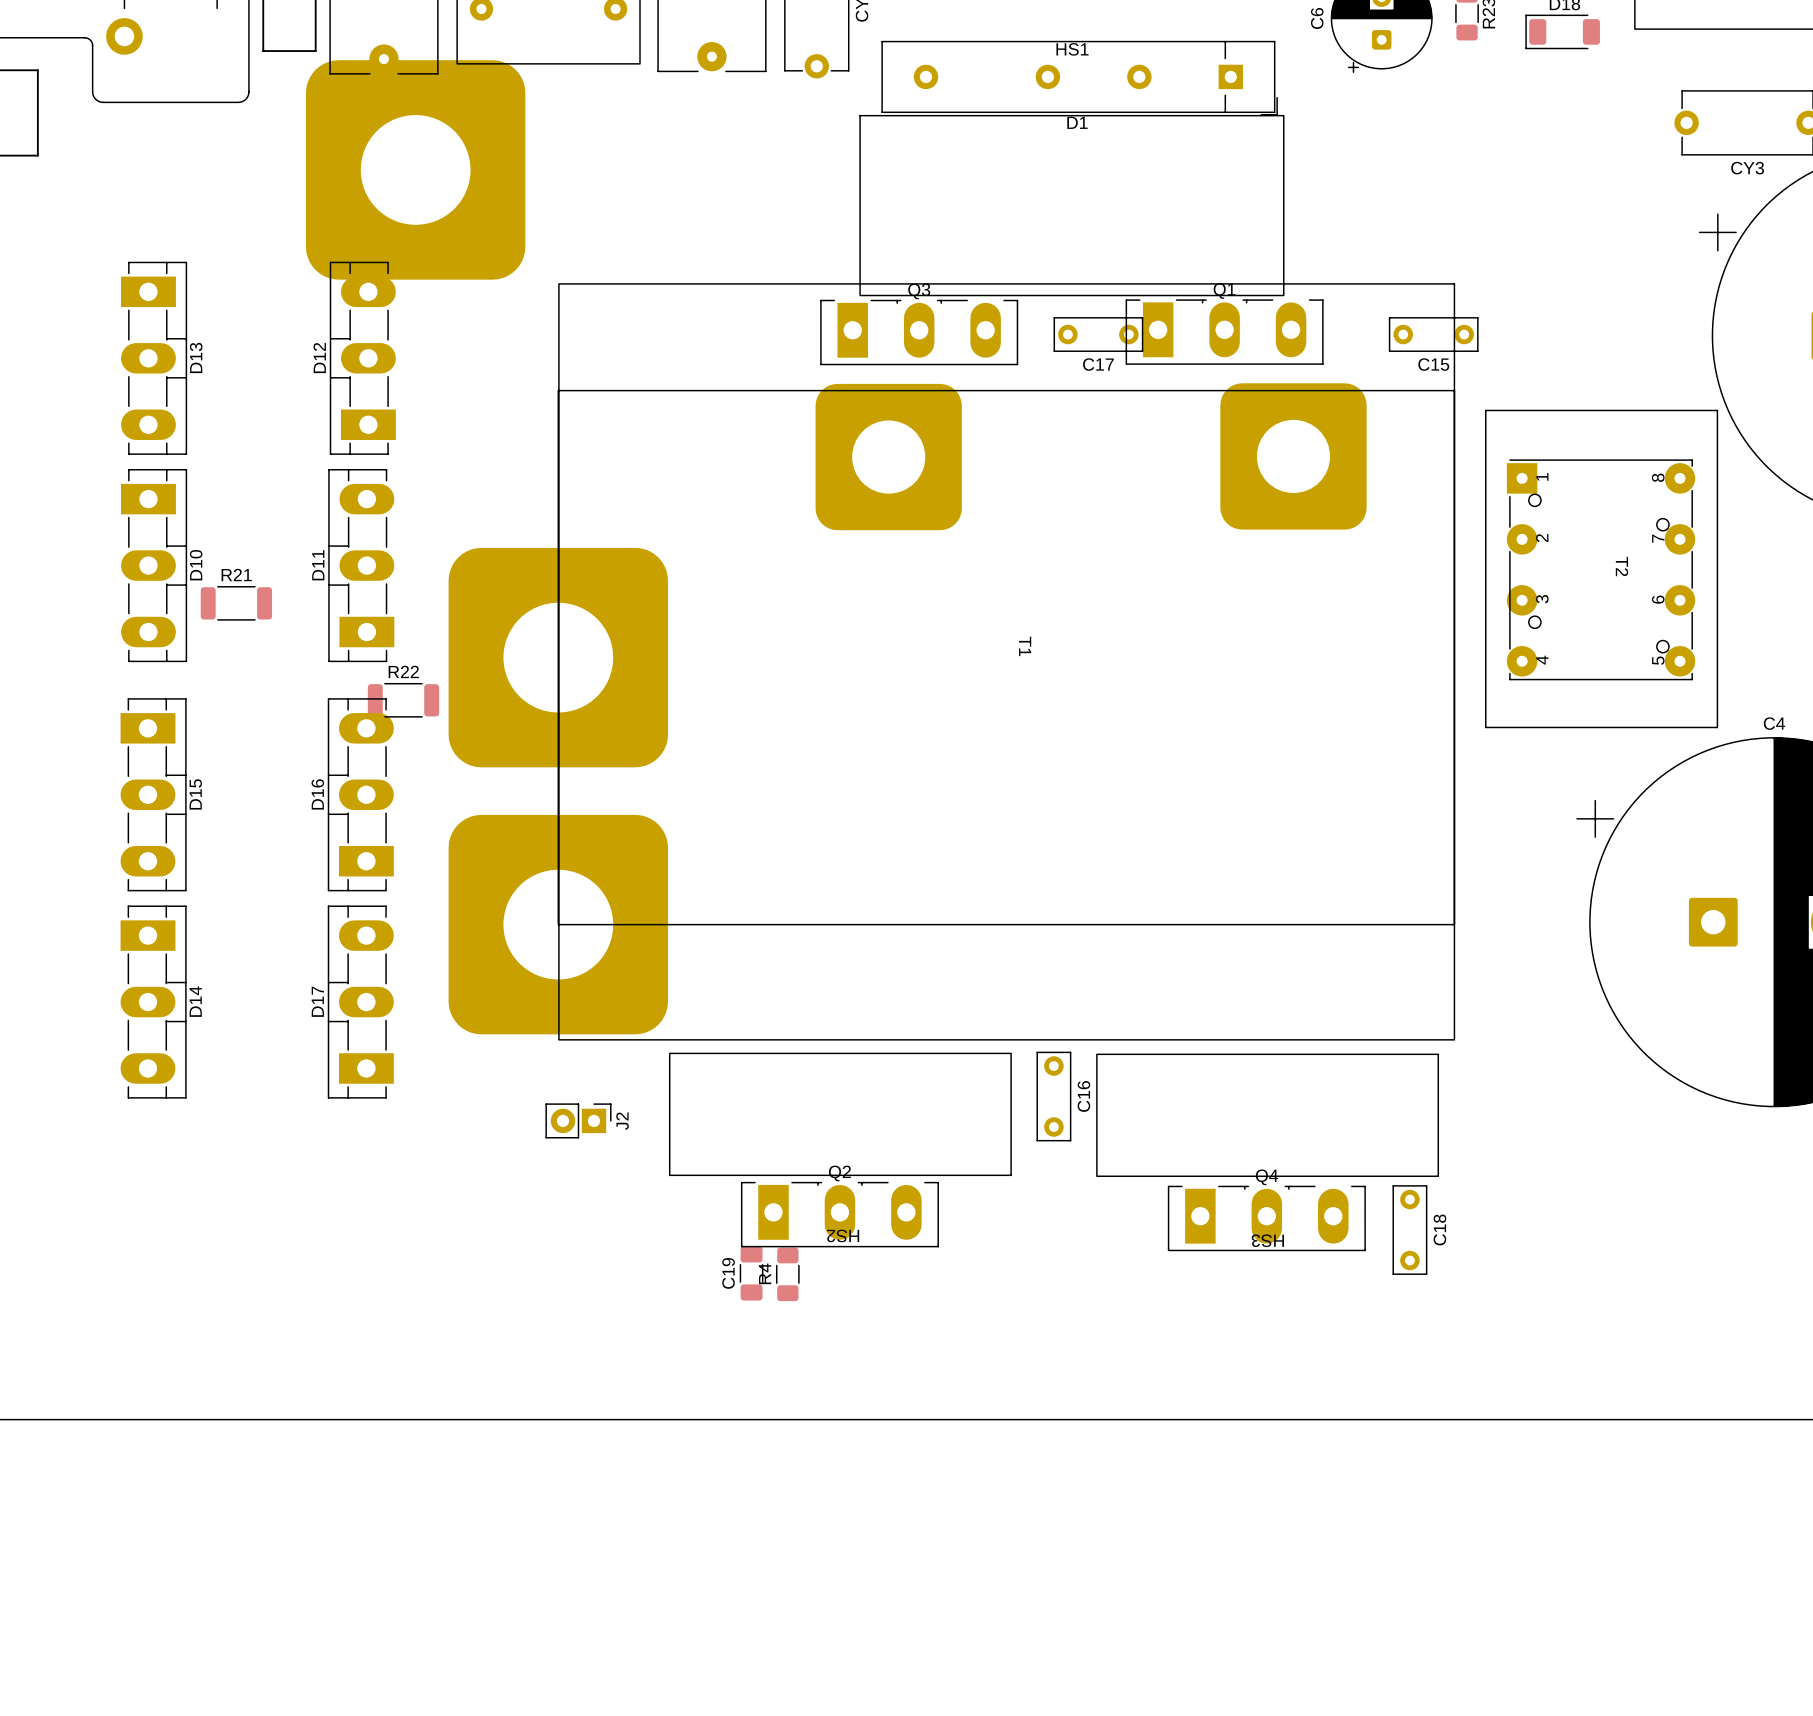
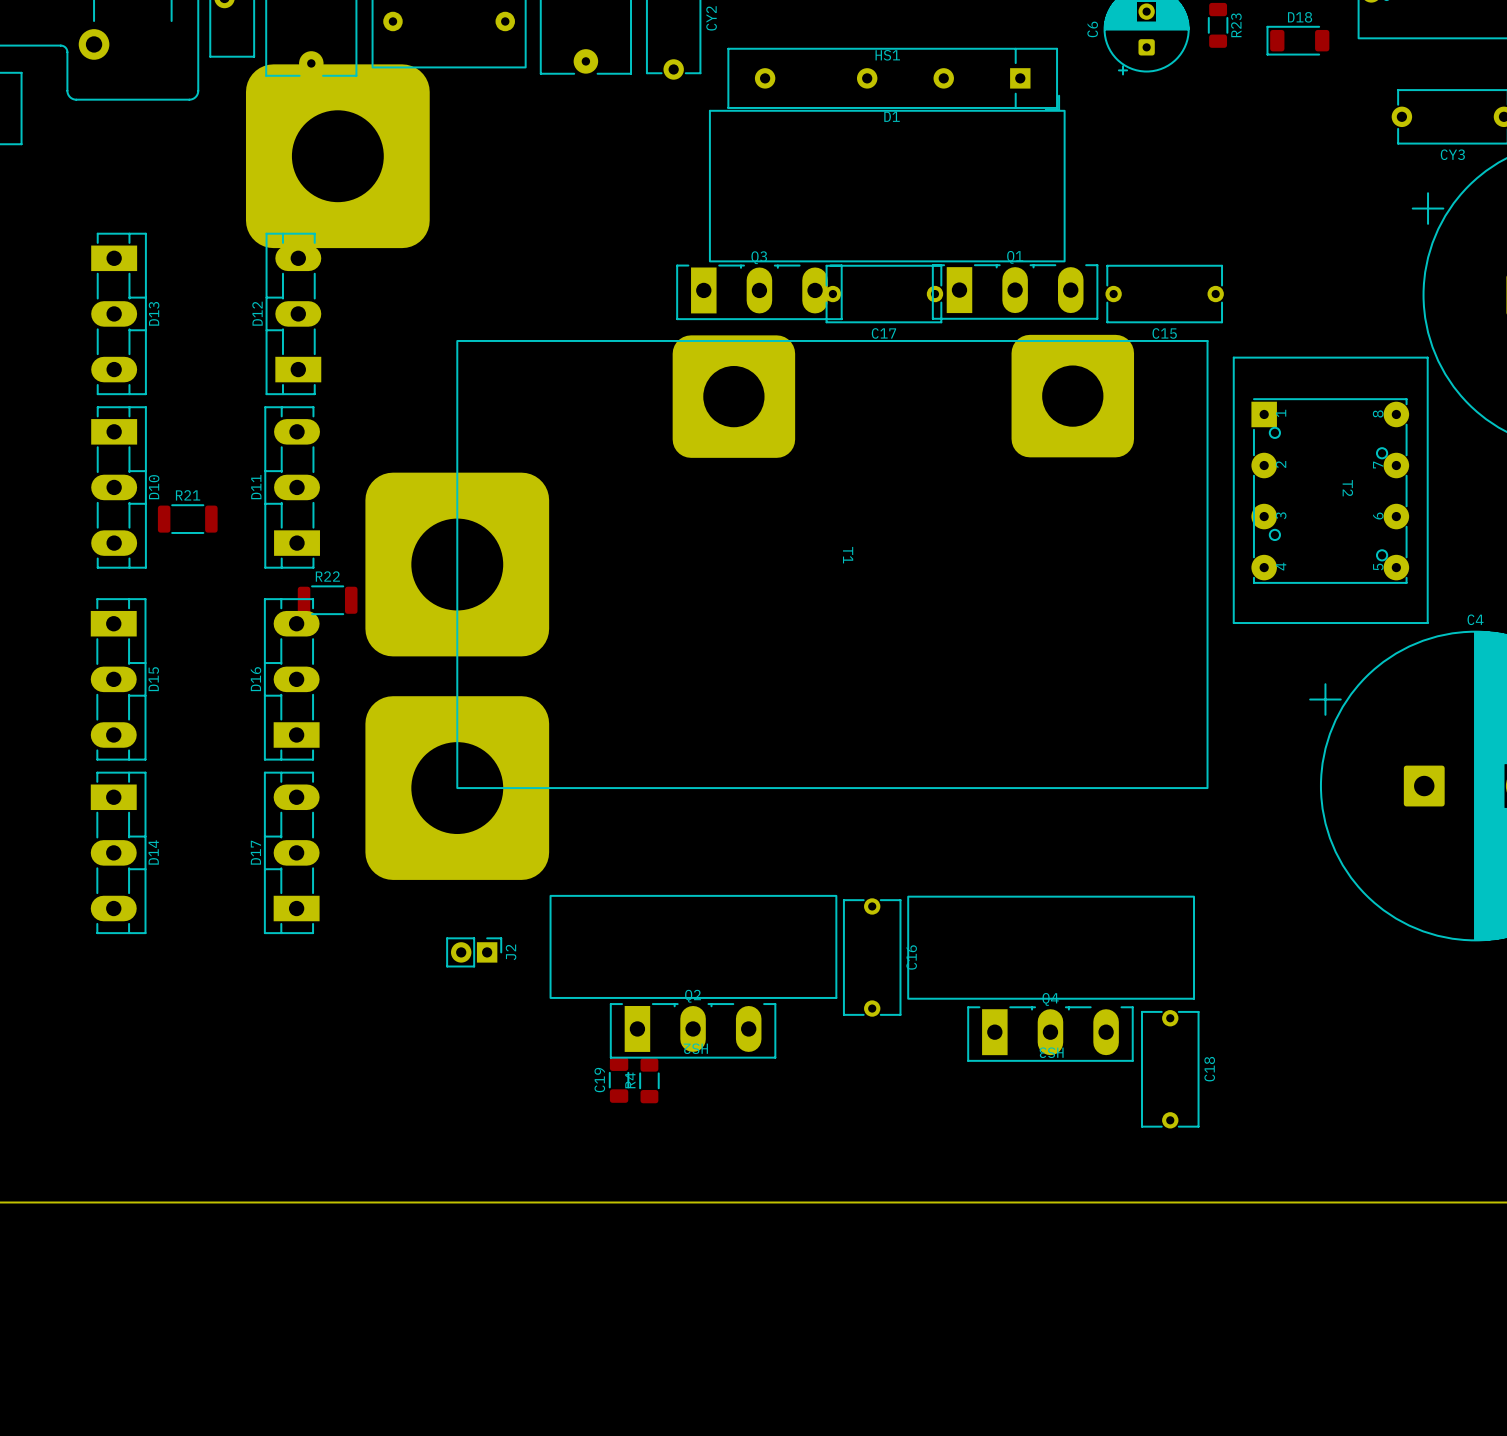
T1 footprint: [305, 60, 1456, 1041] -> [245, 64, 1209, 880]
C17 footprint: [1053, 317, 1144, 352] -> [824, 265, 944, 323]
C15 footprint: [1388, 317, 1479, 352] -> [1105, 265, 1224, 323]
C16 footprint: [1036, 1051, 1072, 1142] -> [843, 898, 902, 1017]
C18 footprint: [1392, 1185, 1428, 1275] -> [1141, 1010, 1200, 1129]

